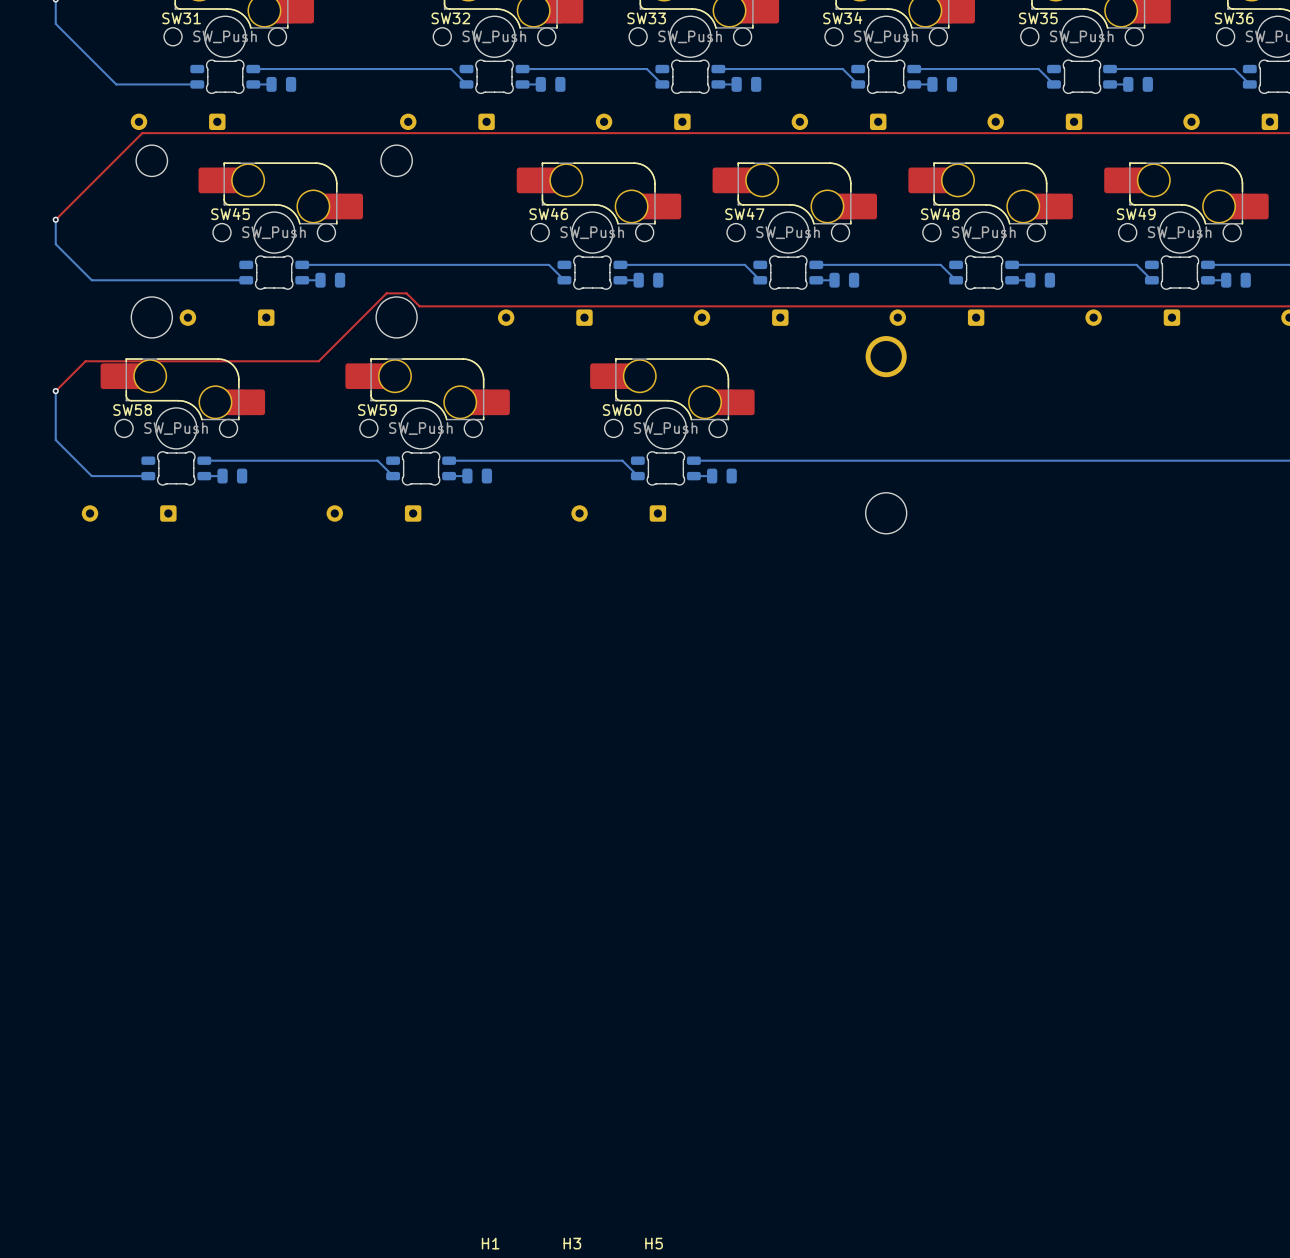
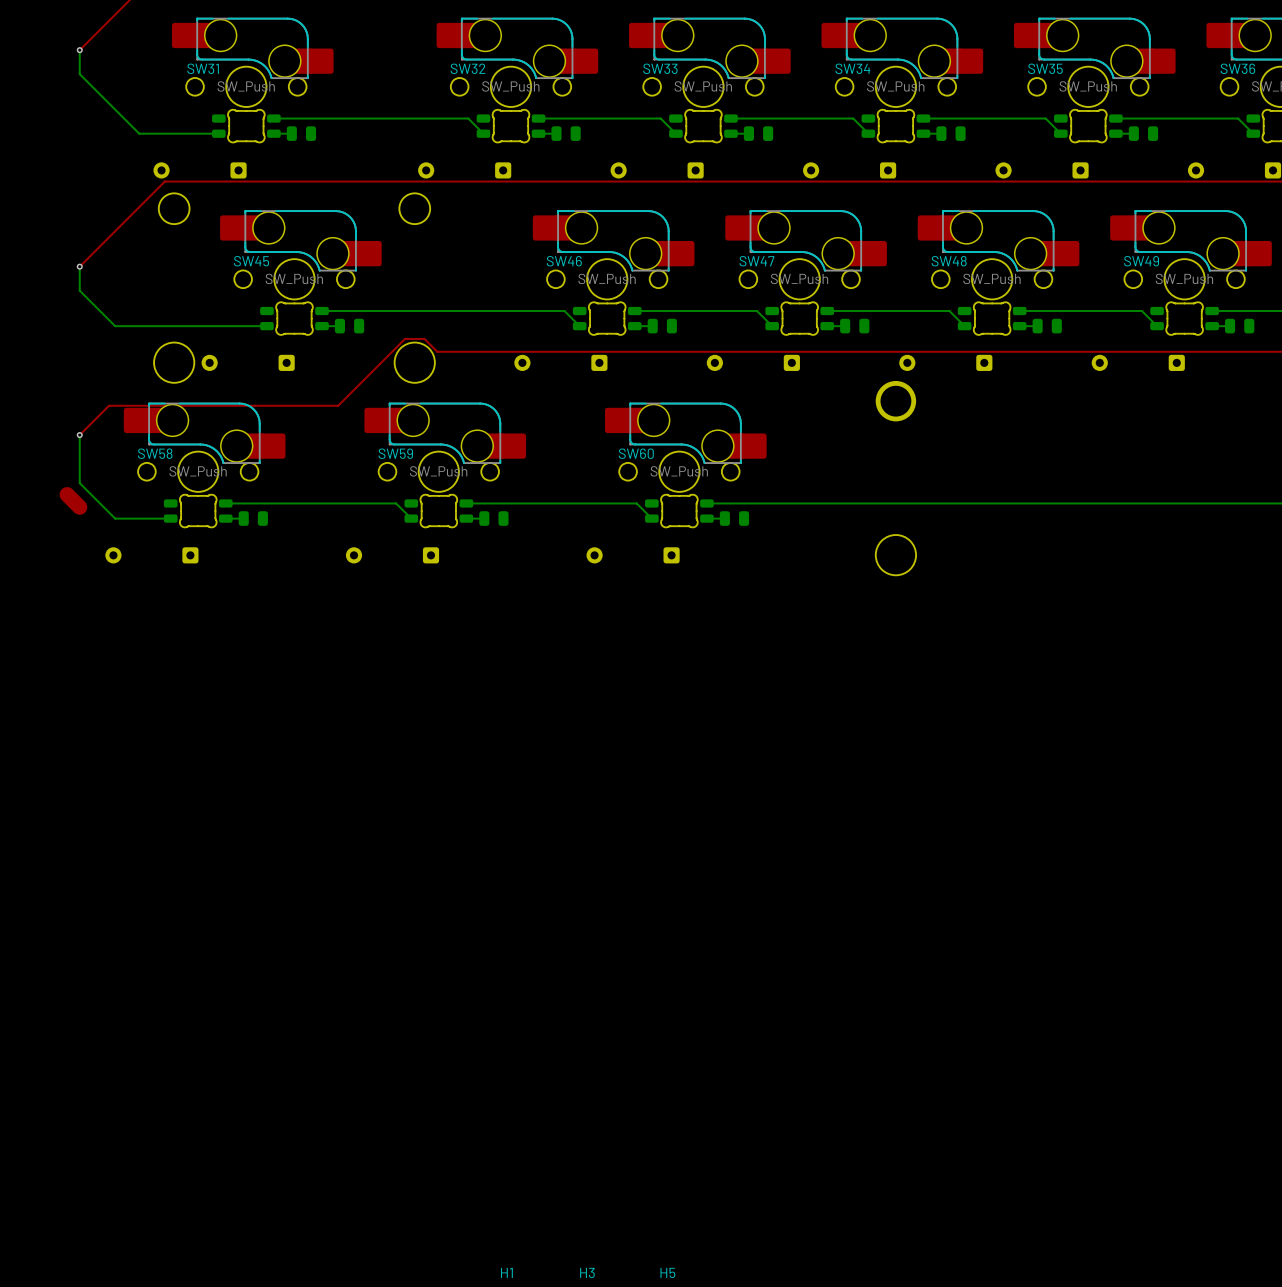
top track: none -> (67, 494) (79, 507)

